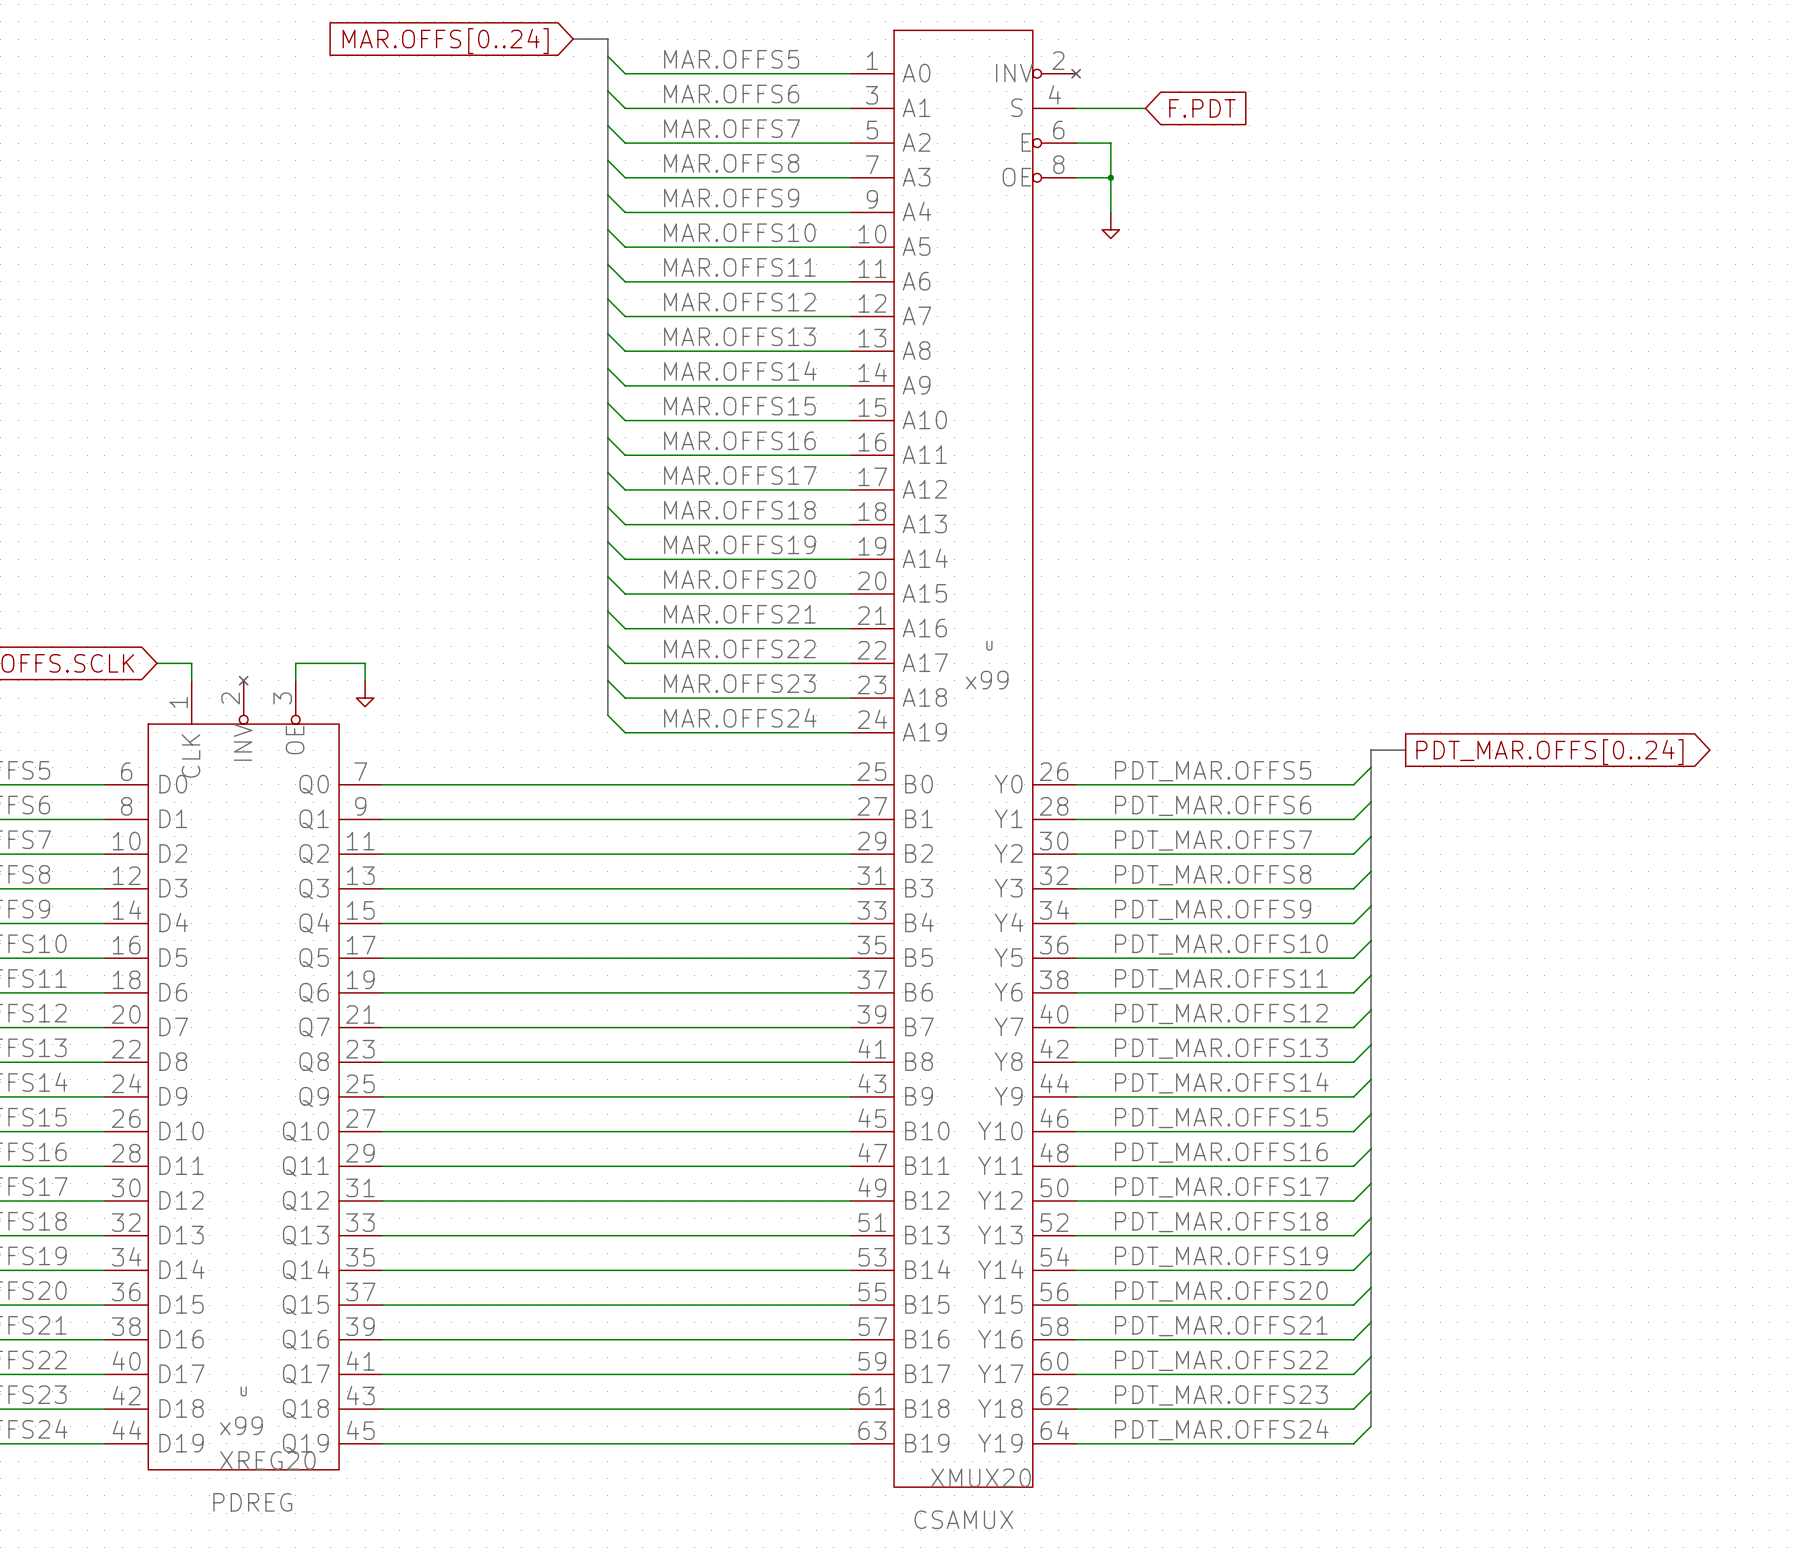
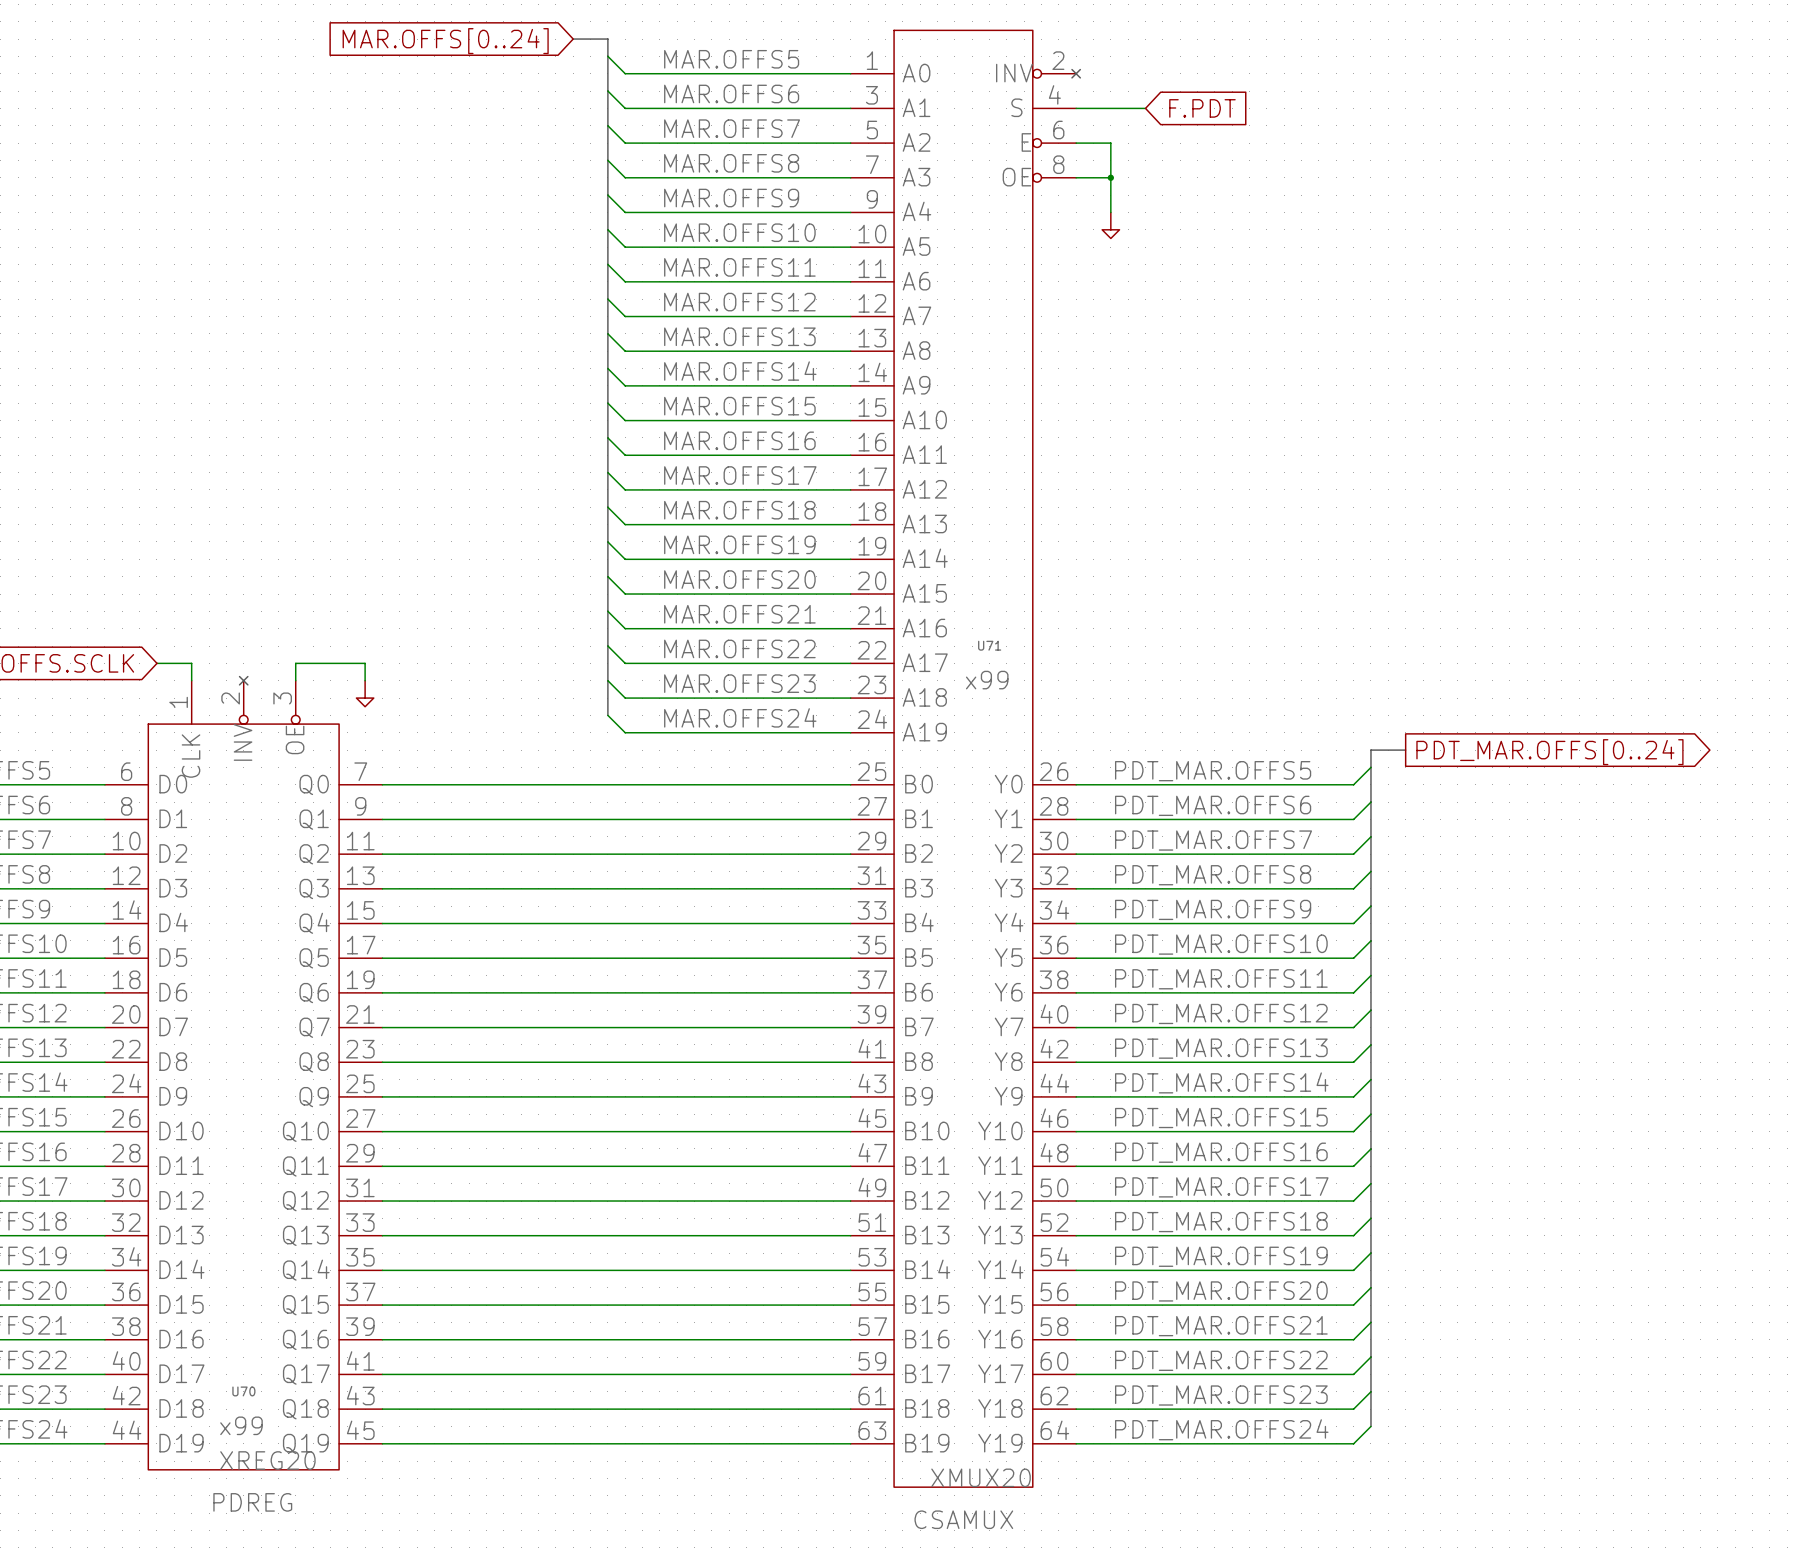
U name: U (989, 645) -> U71 (989, 645)
U name: U (243, 1391) -> U70 (243, 1391)

